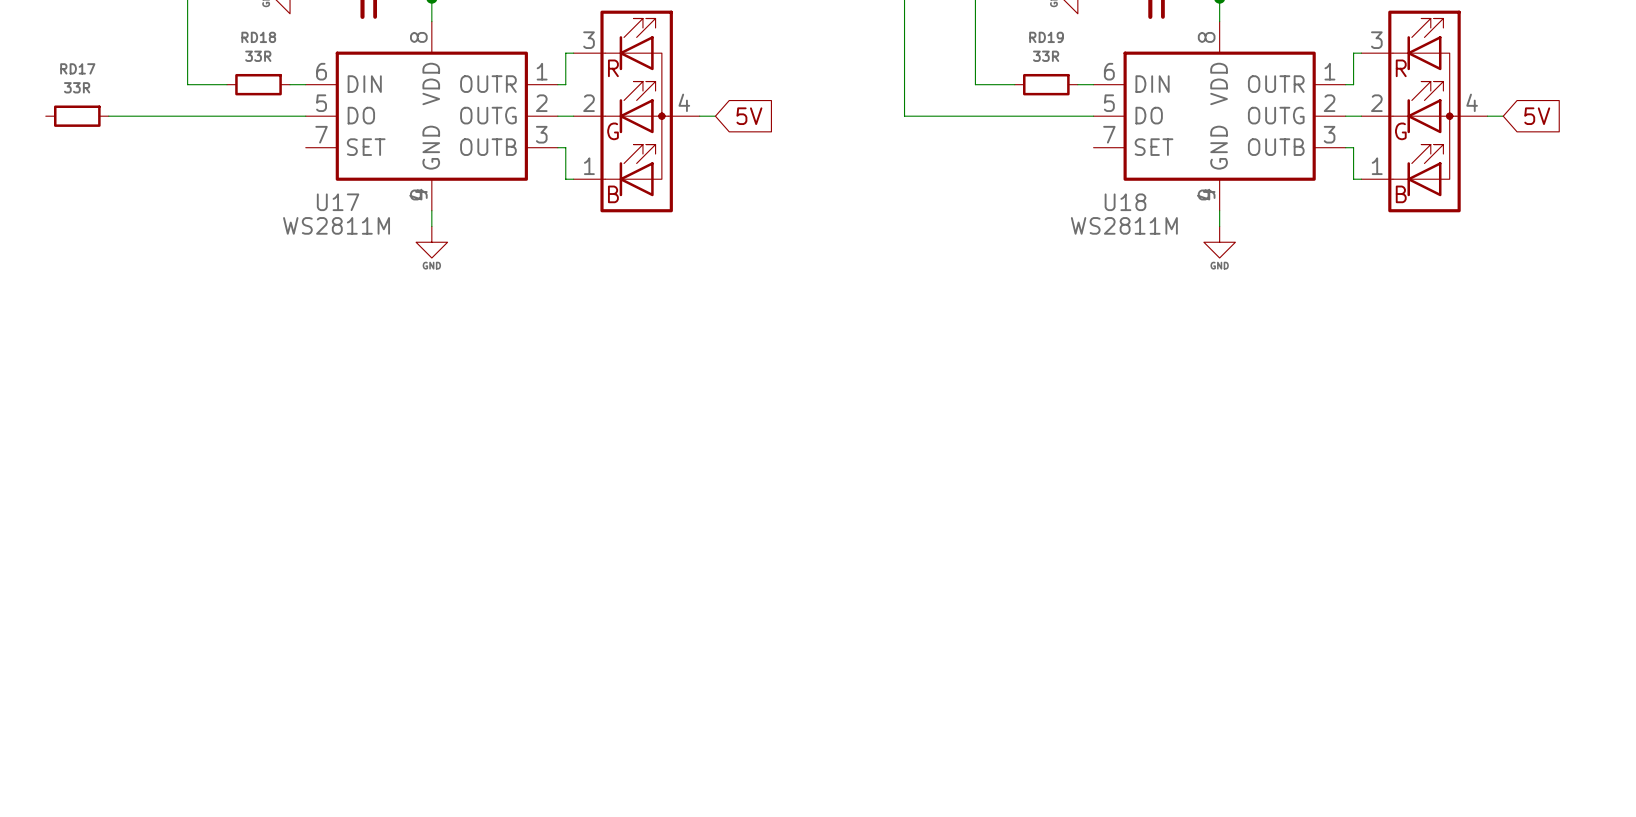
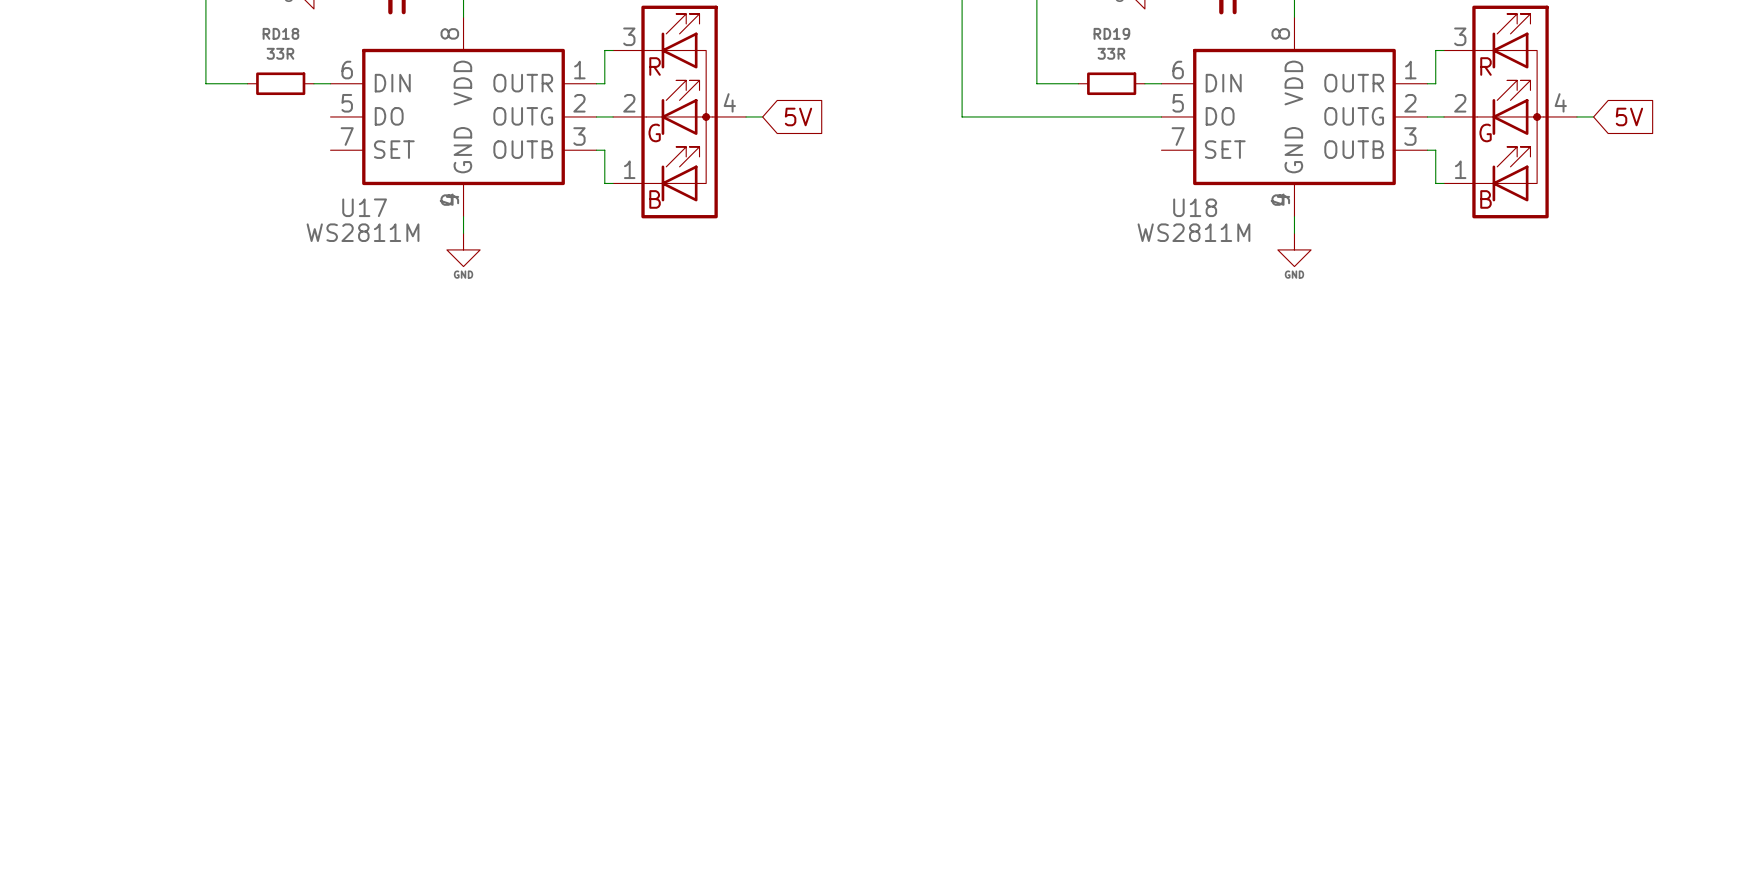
RD17: 33R (77, 116) -> none
wire: (108, 116) (305, 116) -> none

